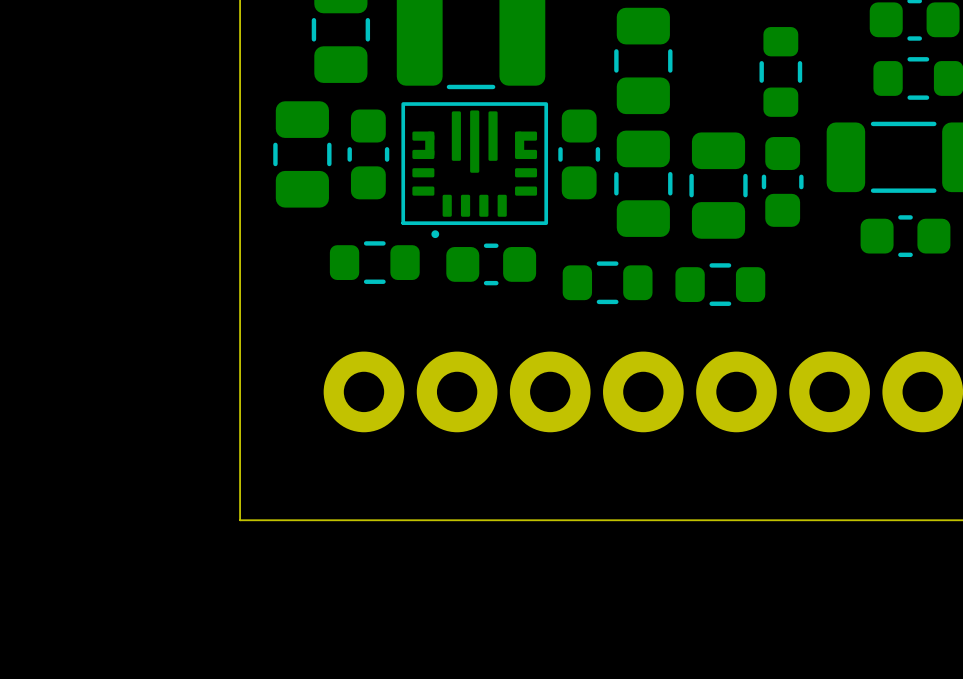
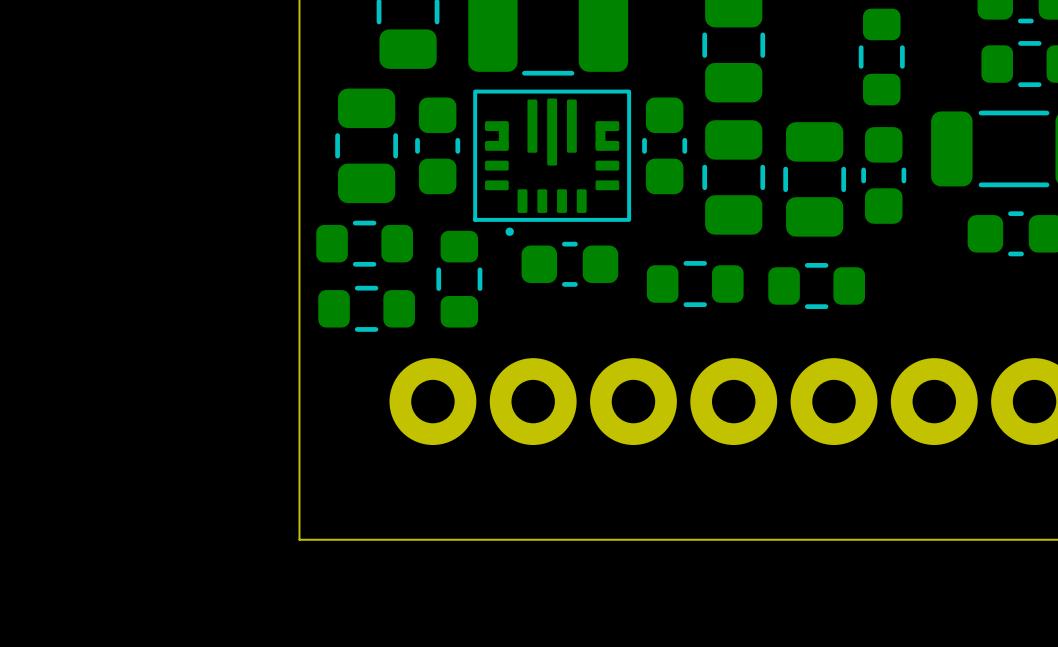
part: none -> (364, 243)
part rotation: 0° (374, 262) -> 90° clockwise (459, 279)
part: none -> (366, 308)

